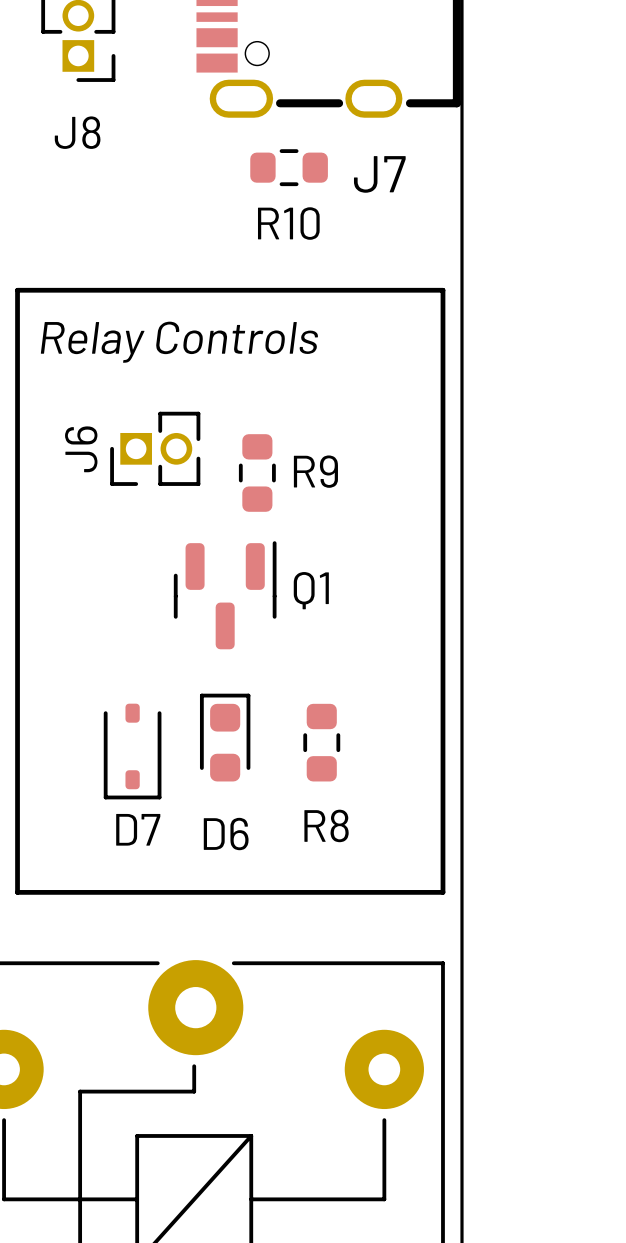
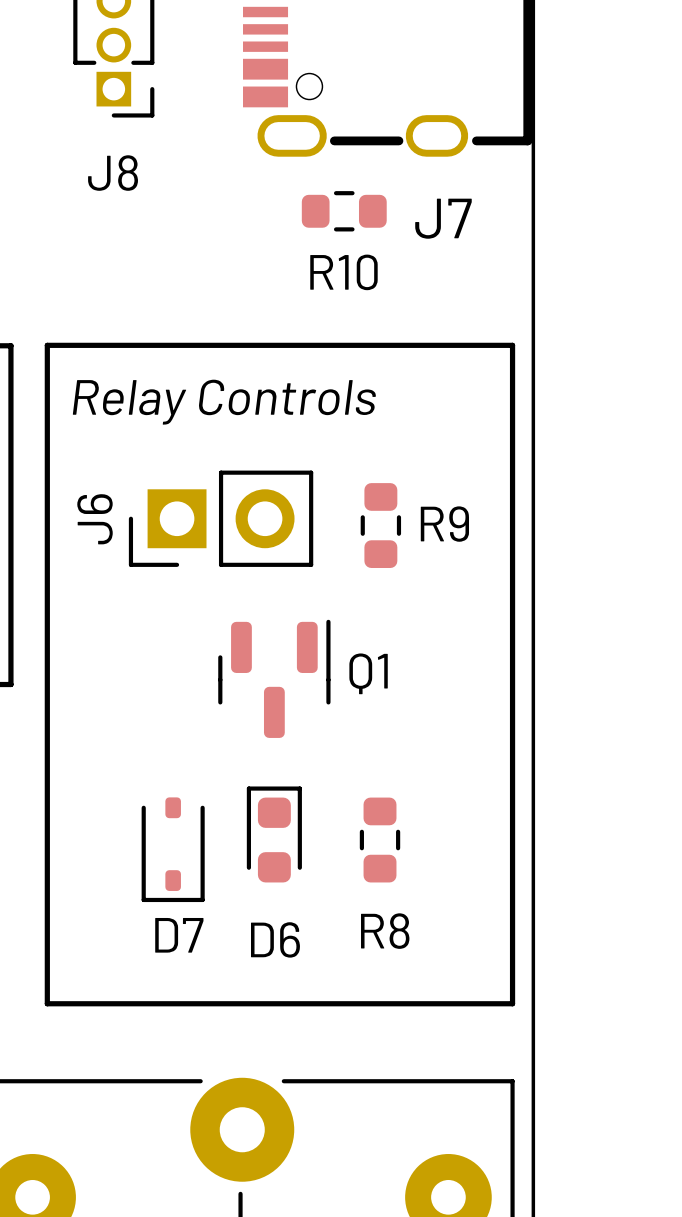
J6 footprint: [110, 411, 201, 486] -> [128, 470, 314, 567]
R9 position: (257, 472) -> (380, 525)

